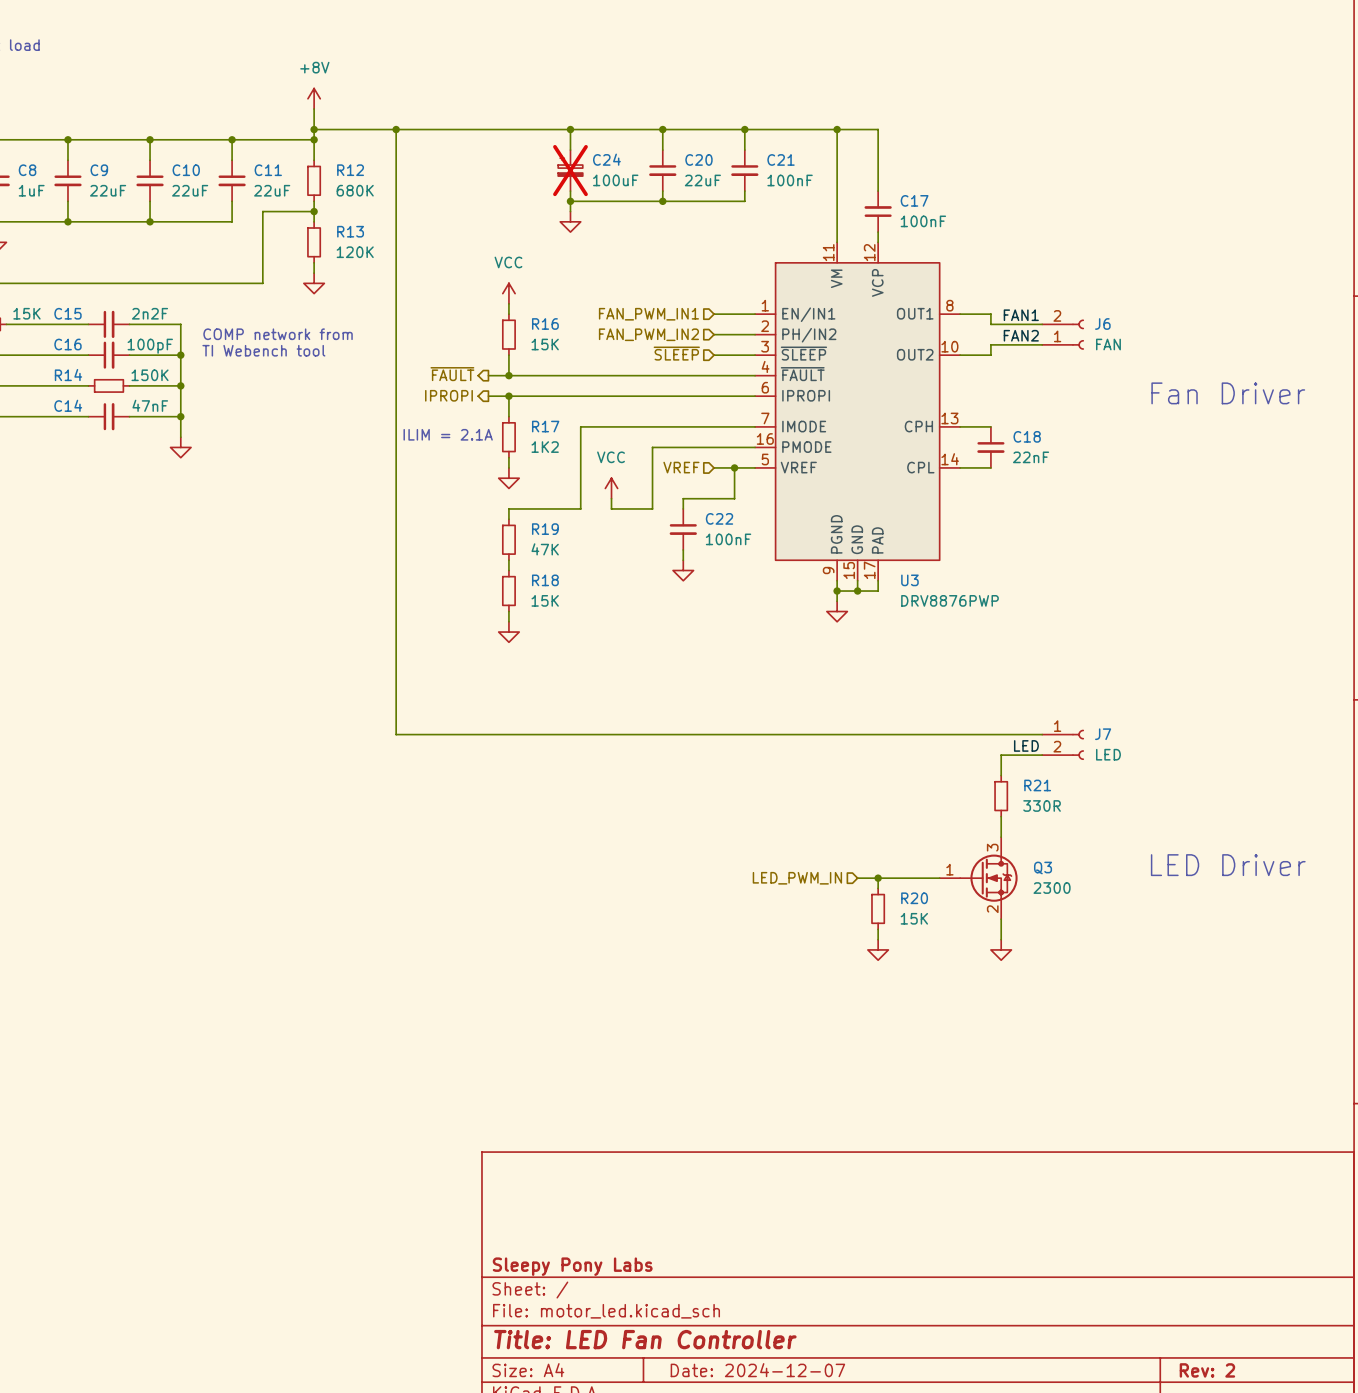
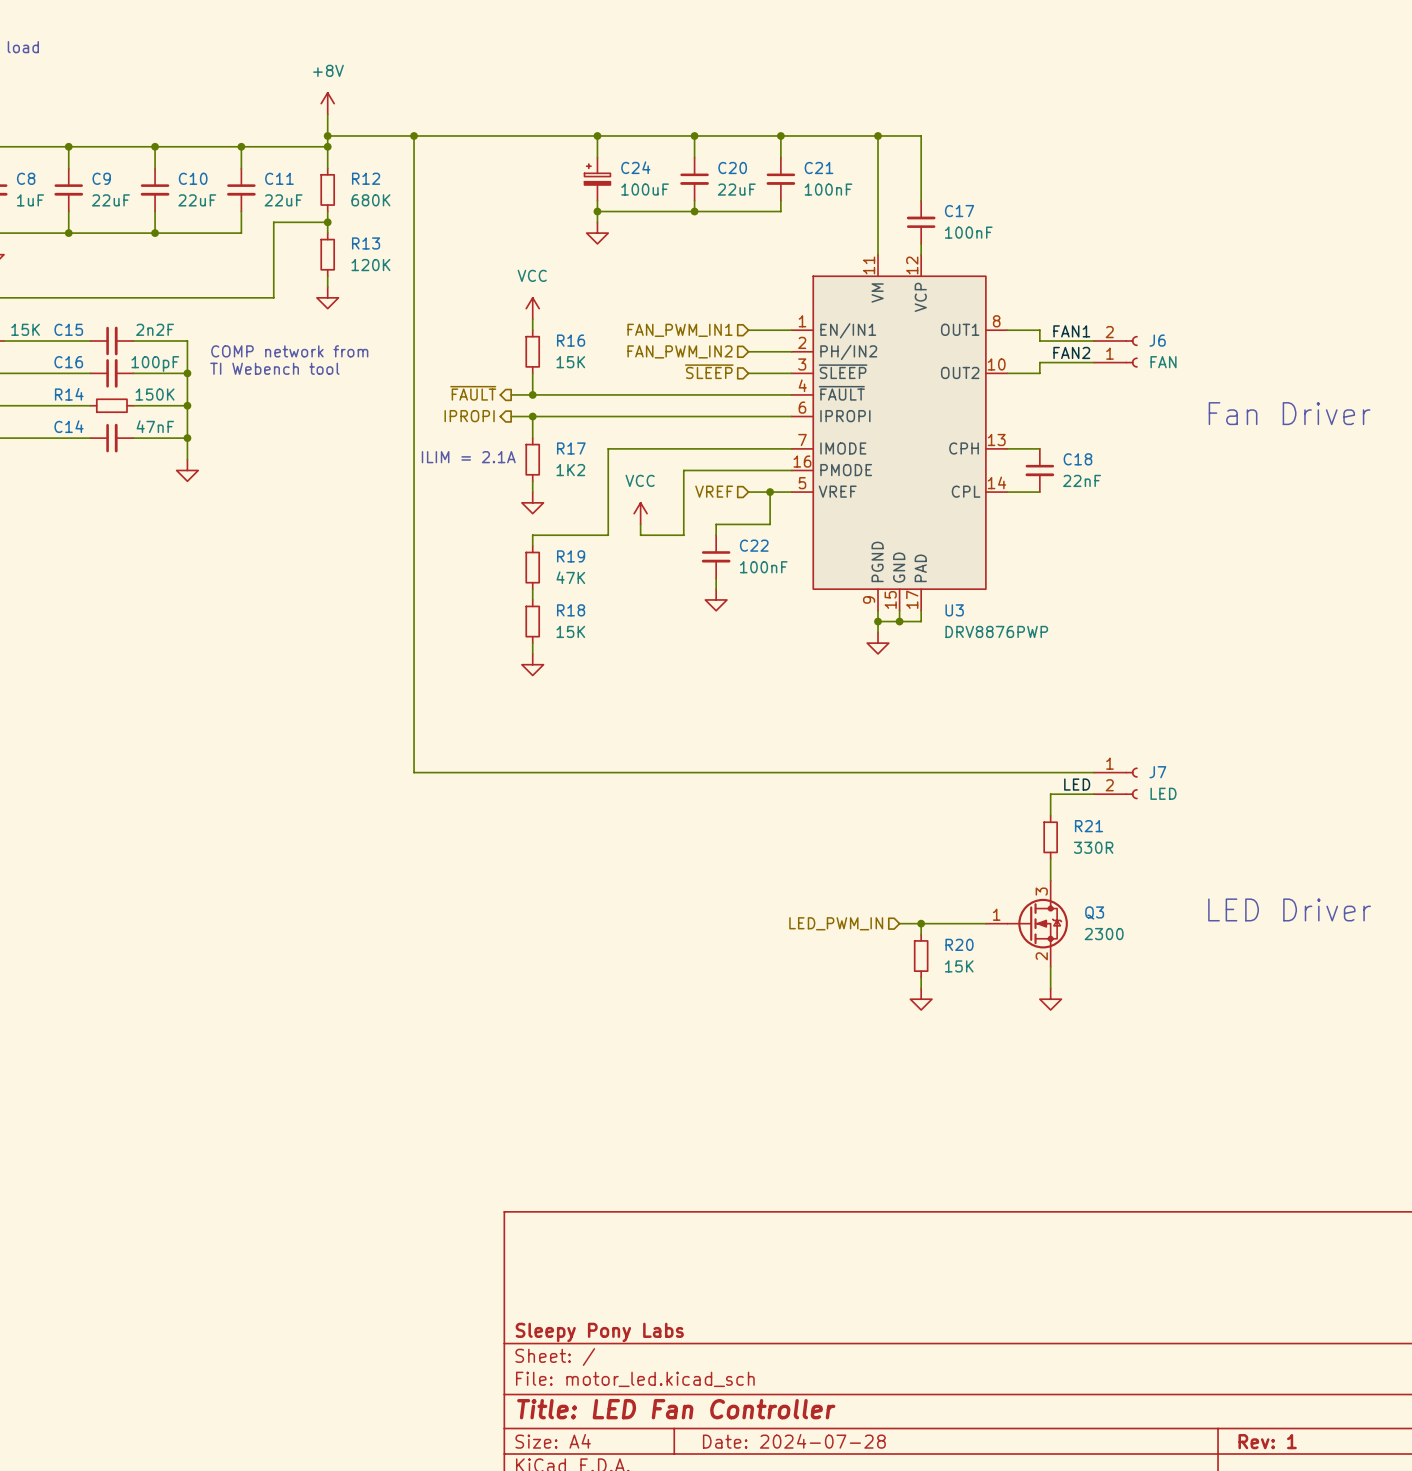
C24 do-not-place cross: (570, 170) -> none
title block: Date: 2024-12-07 (757, 1370) -> Date: 2024-07-28 (794, 1441)
title block: Rev: 2 (1207, 1370) -> Rev: 1 (1267, 1441)

